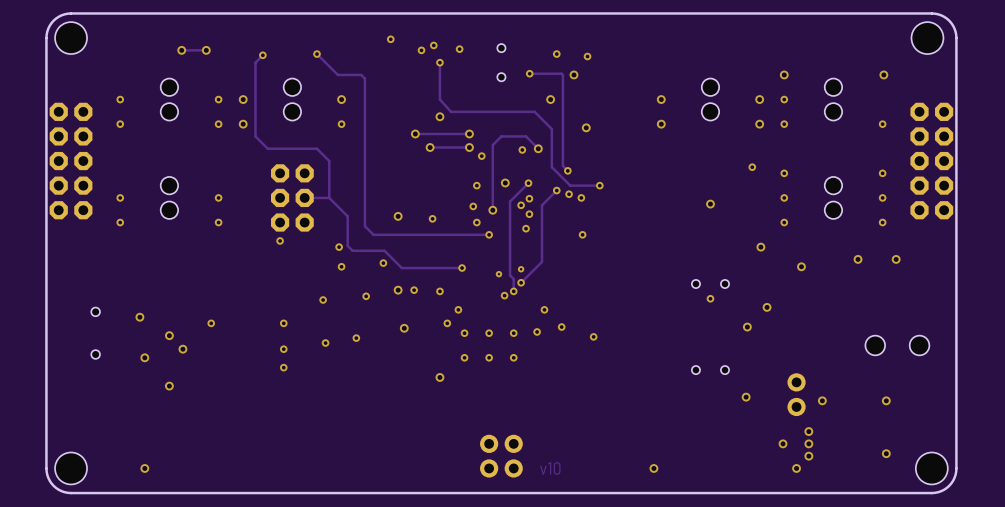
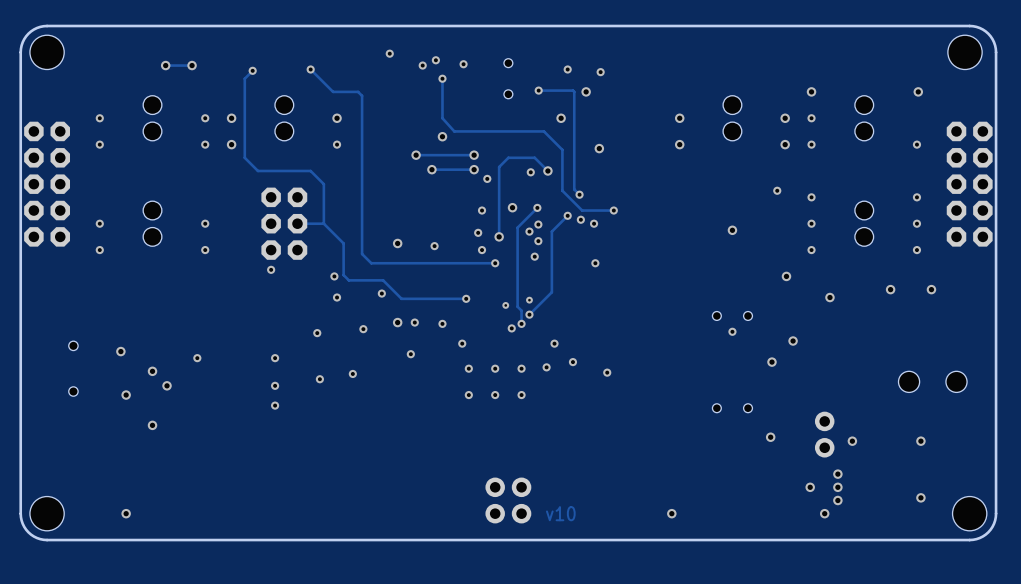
via position: (447, 323) -> (410, 354)
via: (404, 328) -> none
via: (439, 377) -> none

